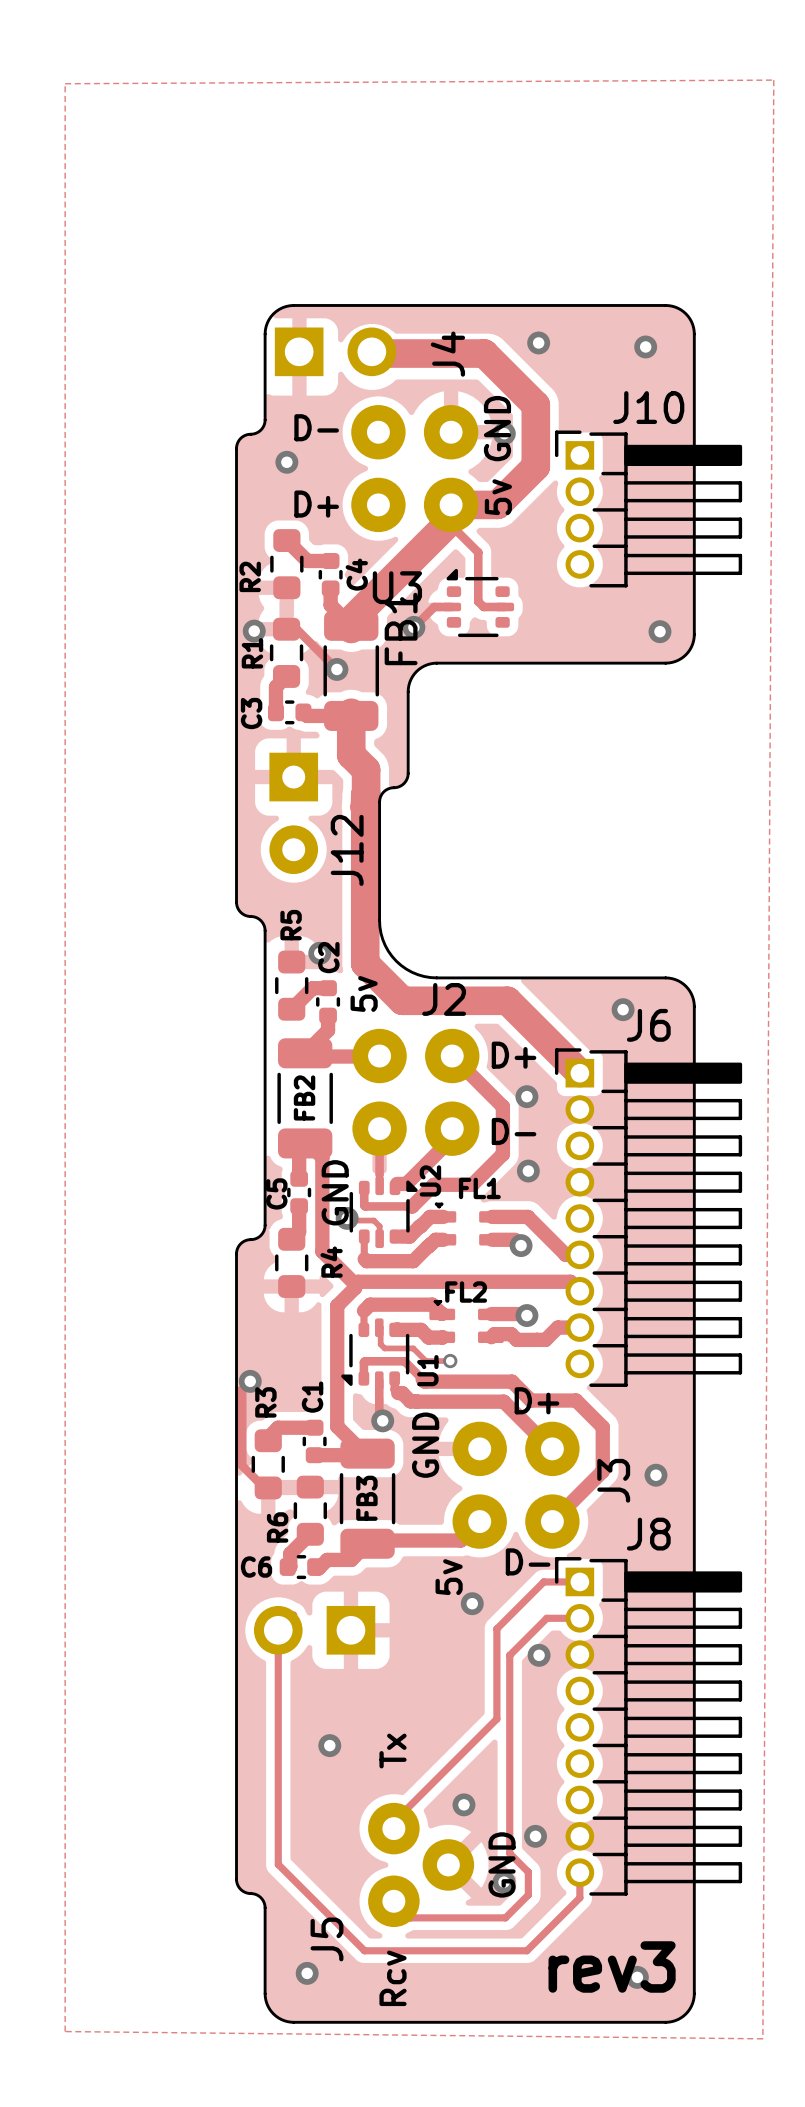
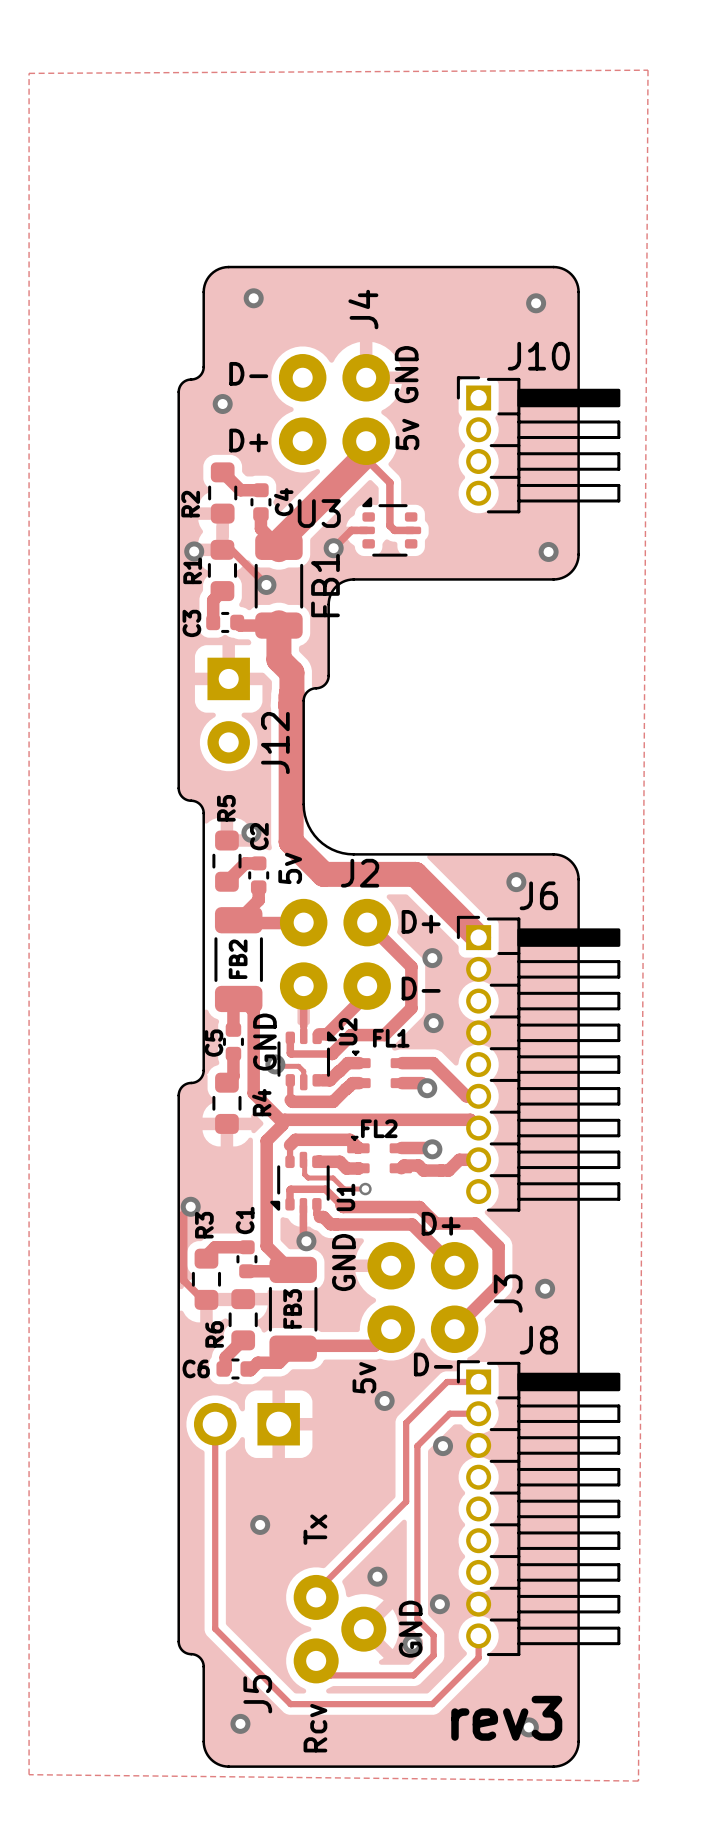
via: none -> (253, 298)
via: (538, 342) -> none
part: (335, 351) -> none
track: (371, 351) (371, 355) (374, 353) (484, 353) (535, 405) (535, 466) (497, 504) (451, 504) -> none
via: (504, 433) -> none
FB1 name position: FB1 (401, 628) -> FB1 (325, 585)

